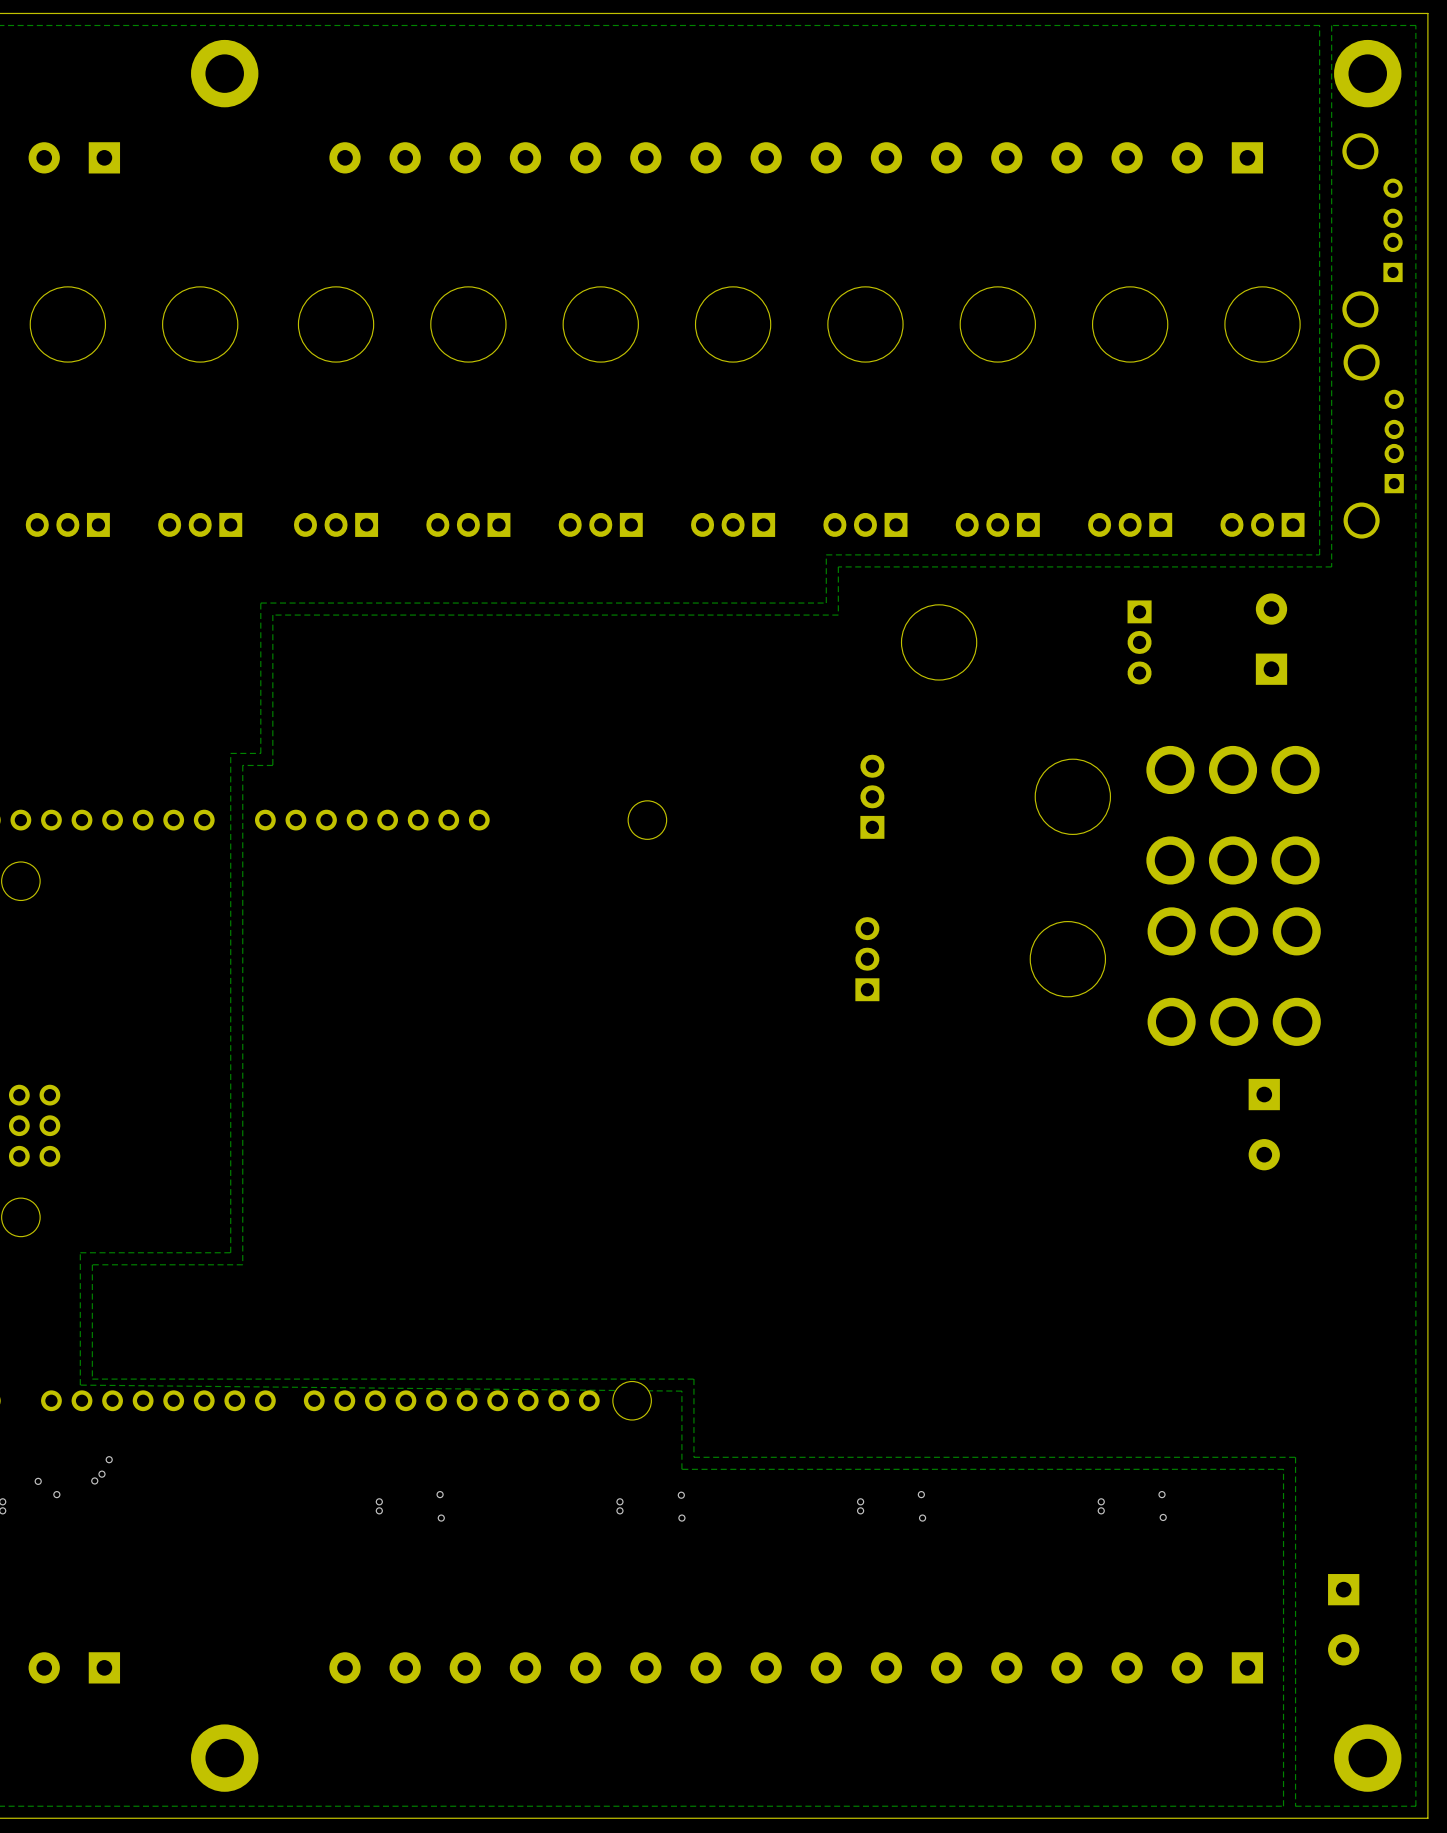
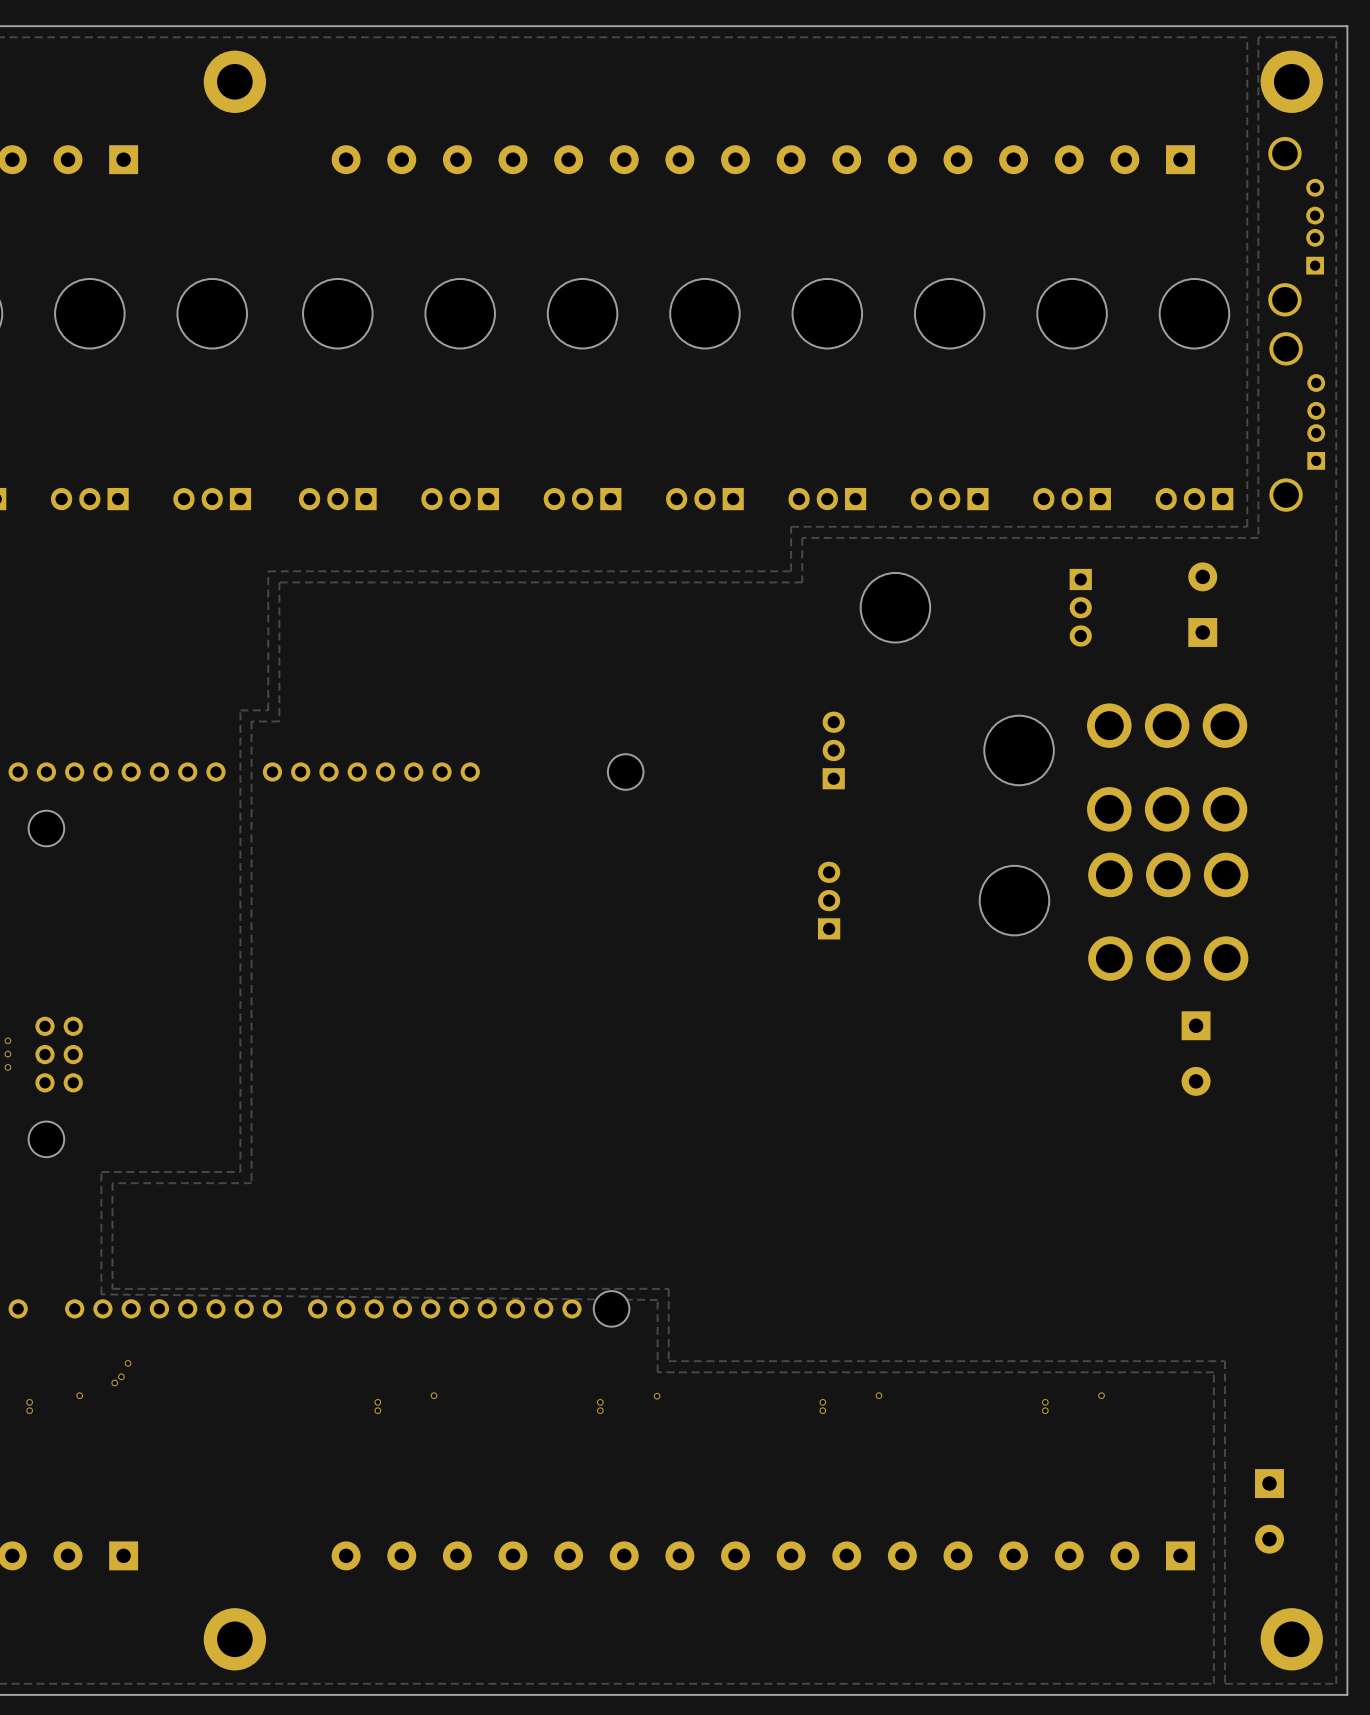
via: (38, 1481) -> none
via: (1163, 1517) -> none
via: (441, 1518) -> none
via: (681, 1518) -> none
via: (922, 1518) -> none

